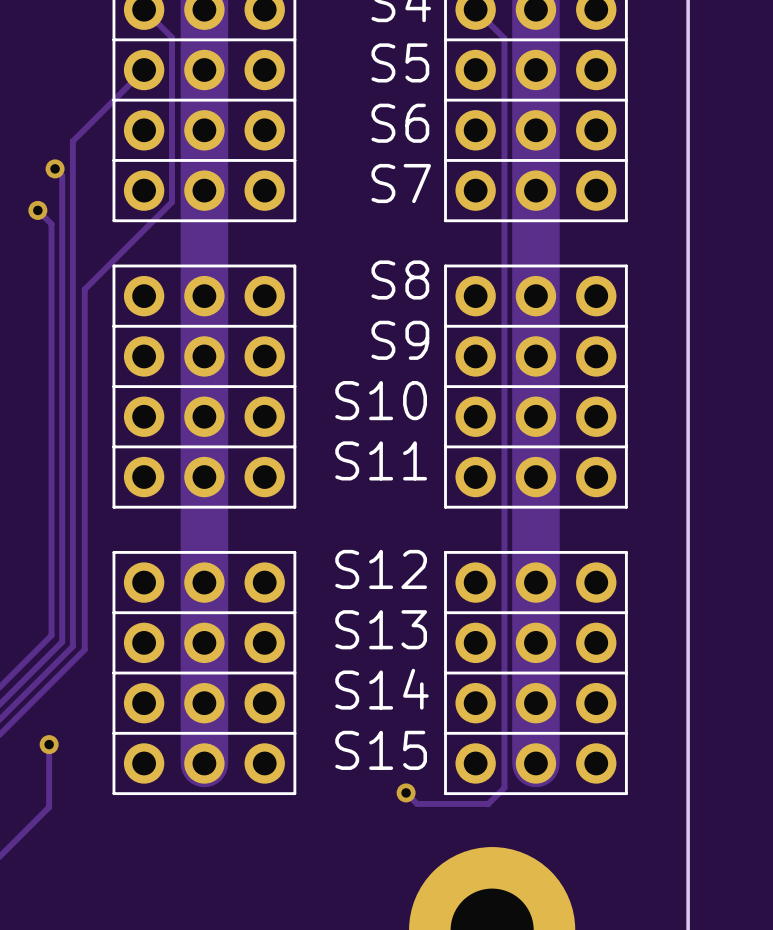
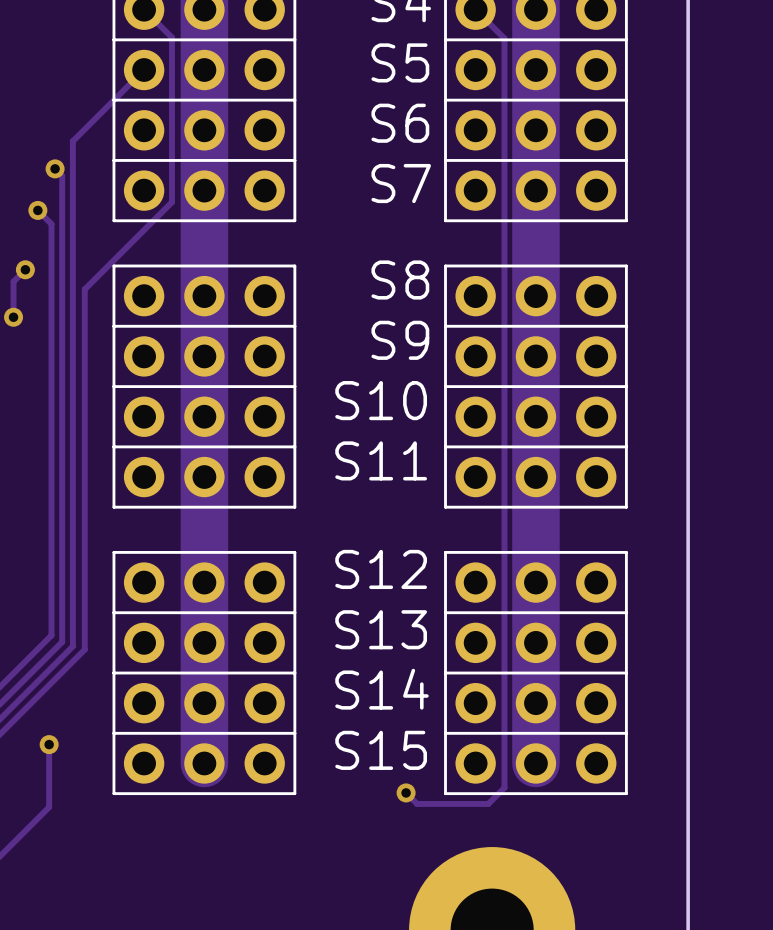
track: none -> (25, 269) (13, 281) (13, 317)
via: none -> (25, 269)
via: none -> (13, 317)

